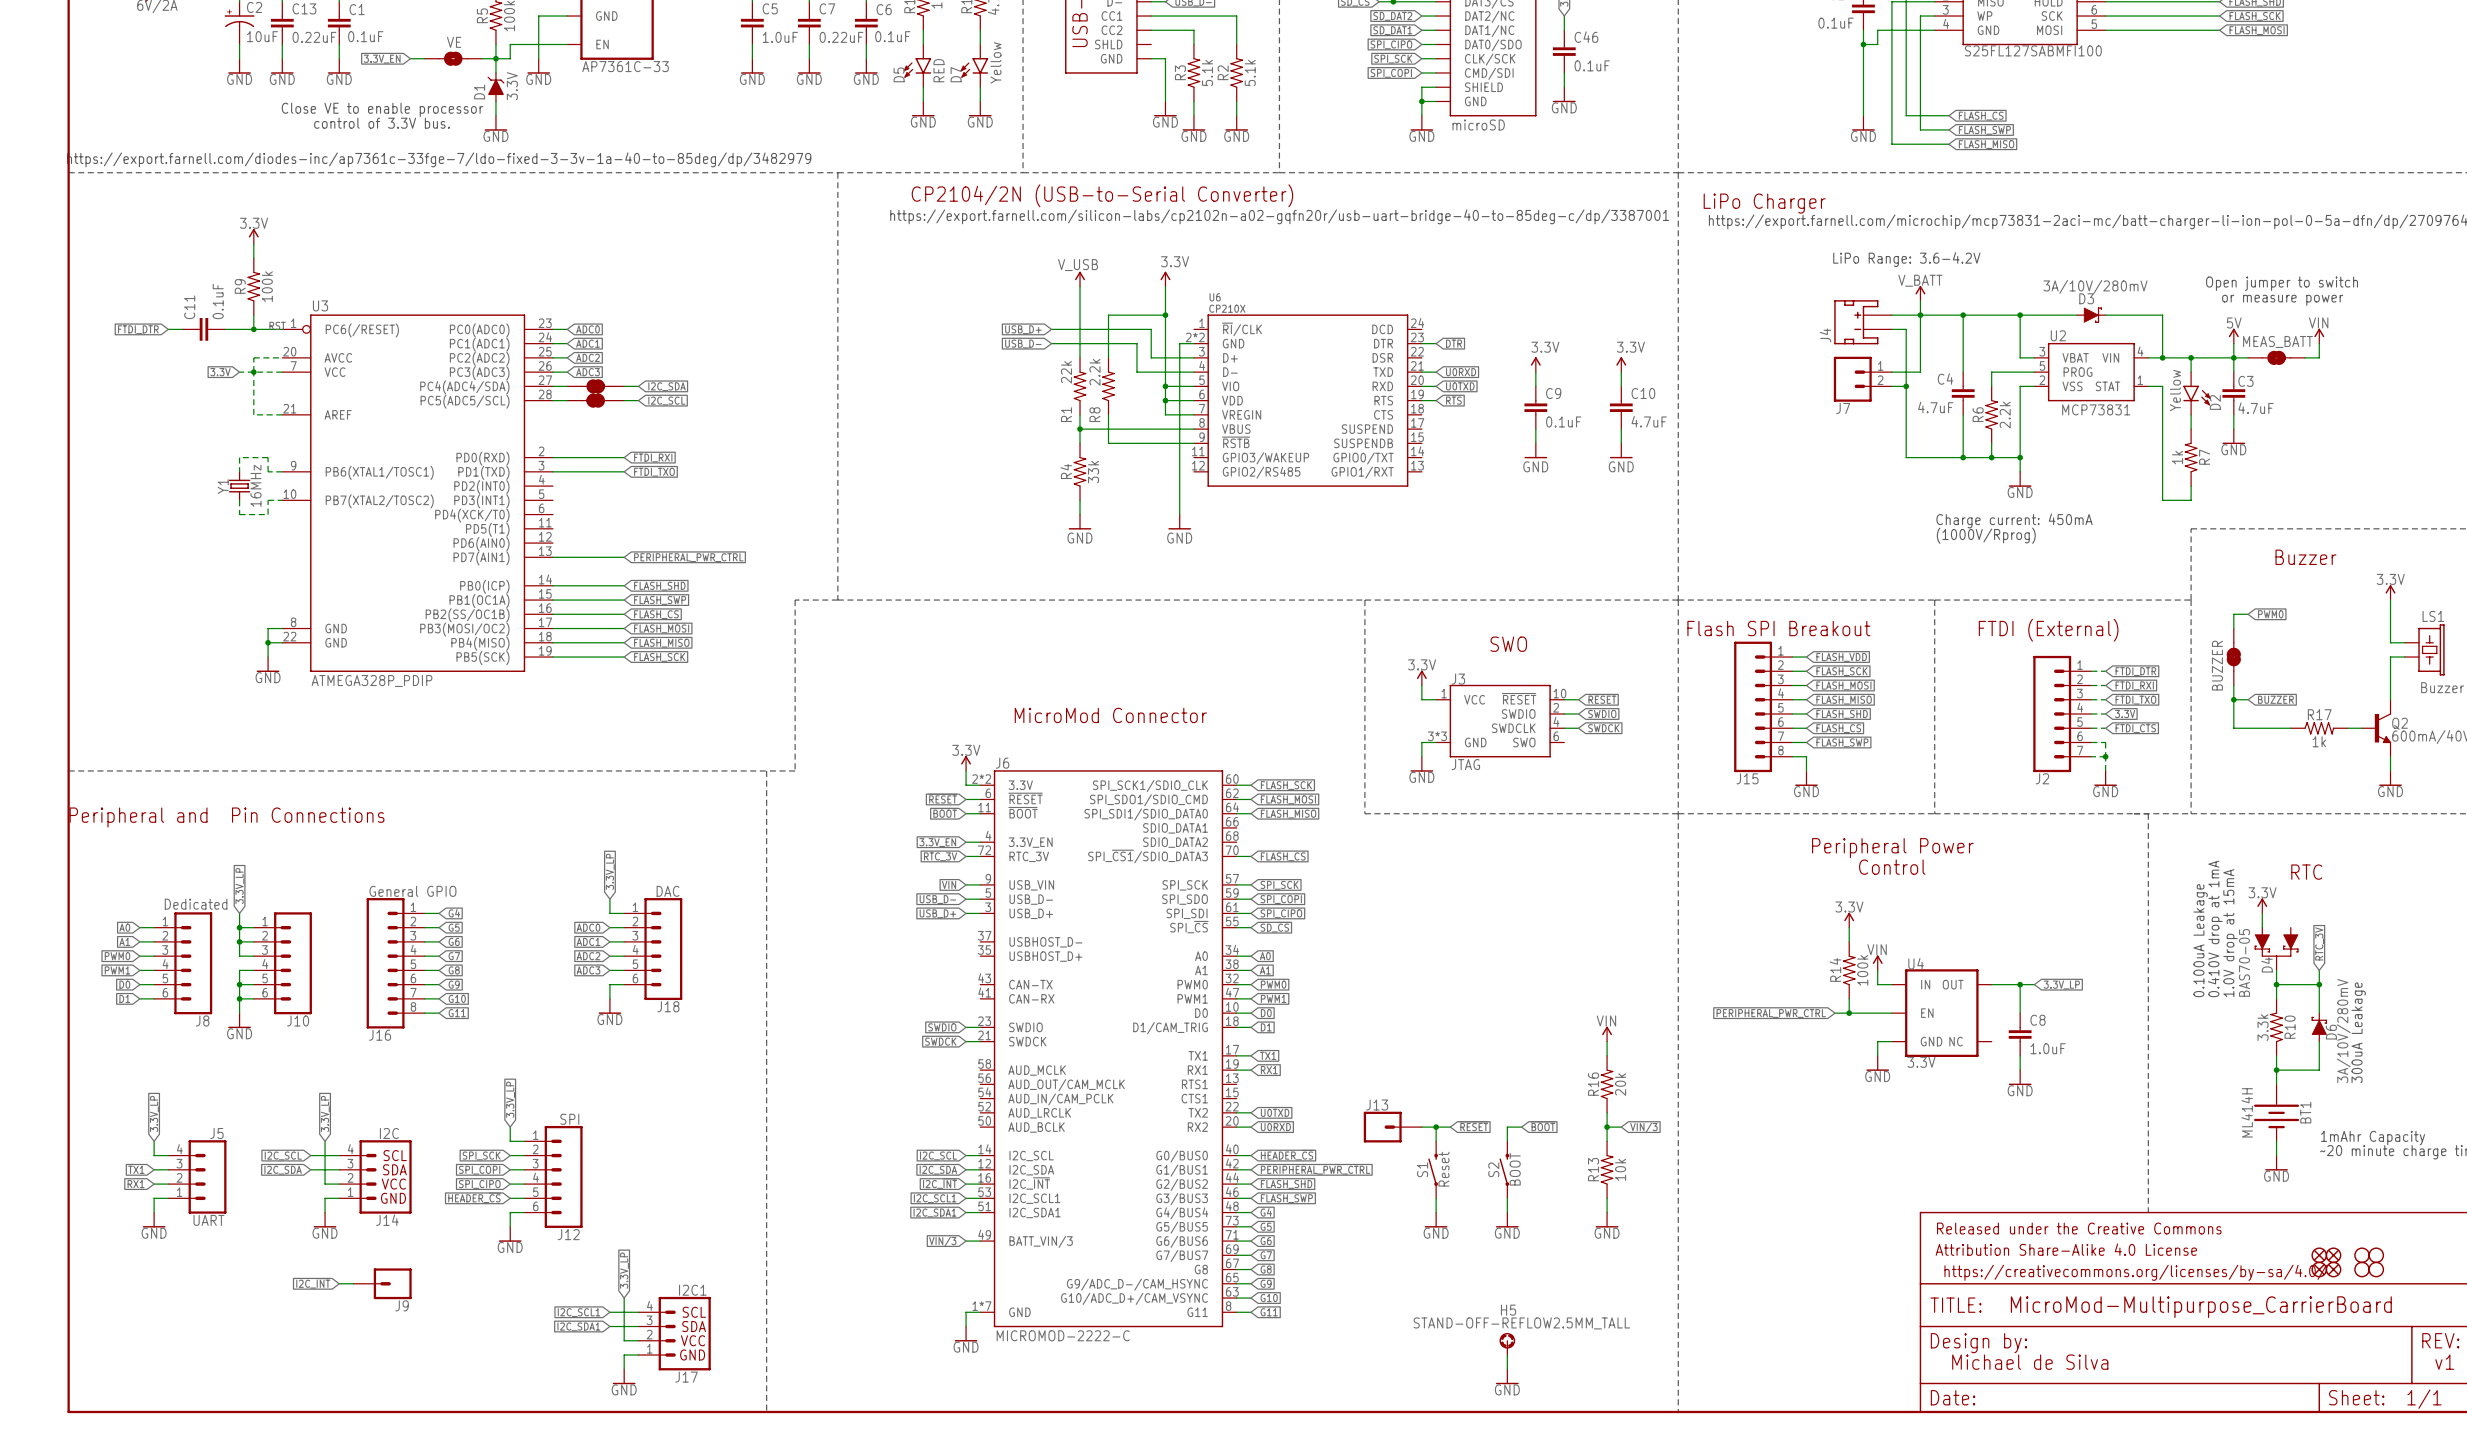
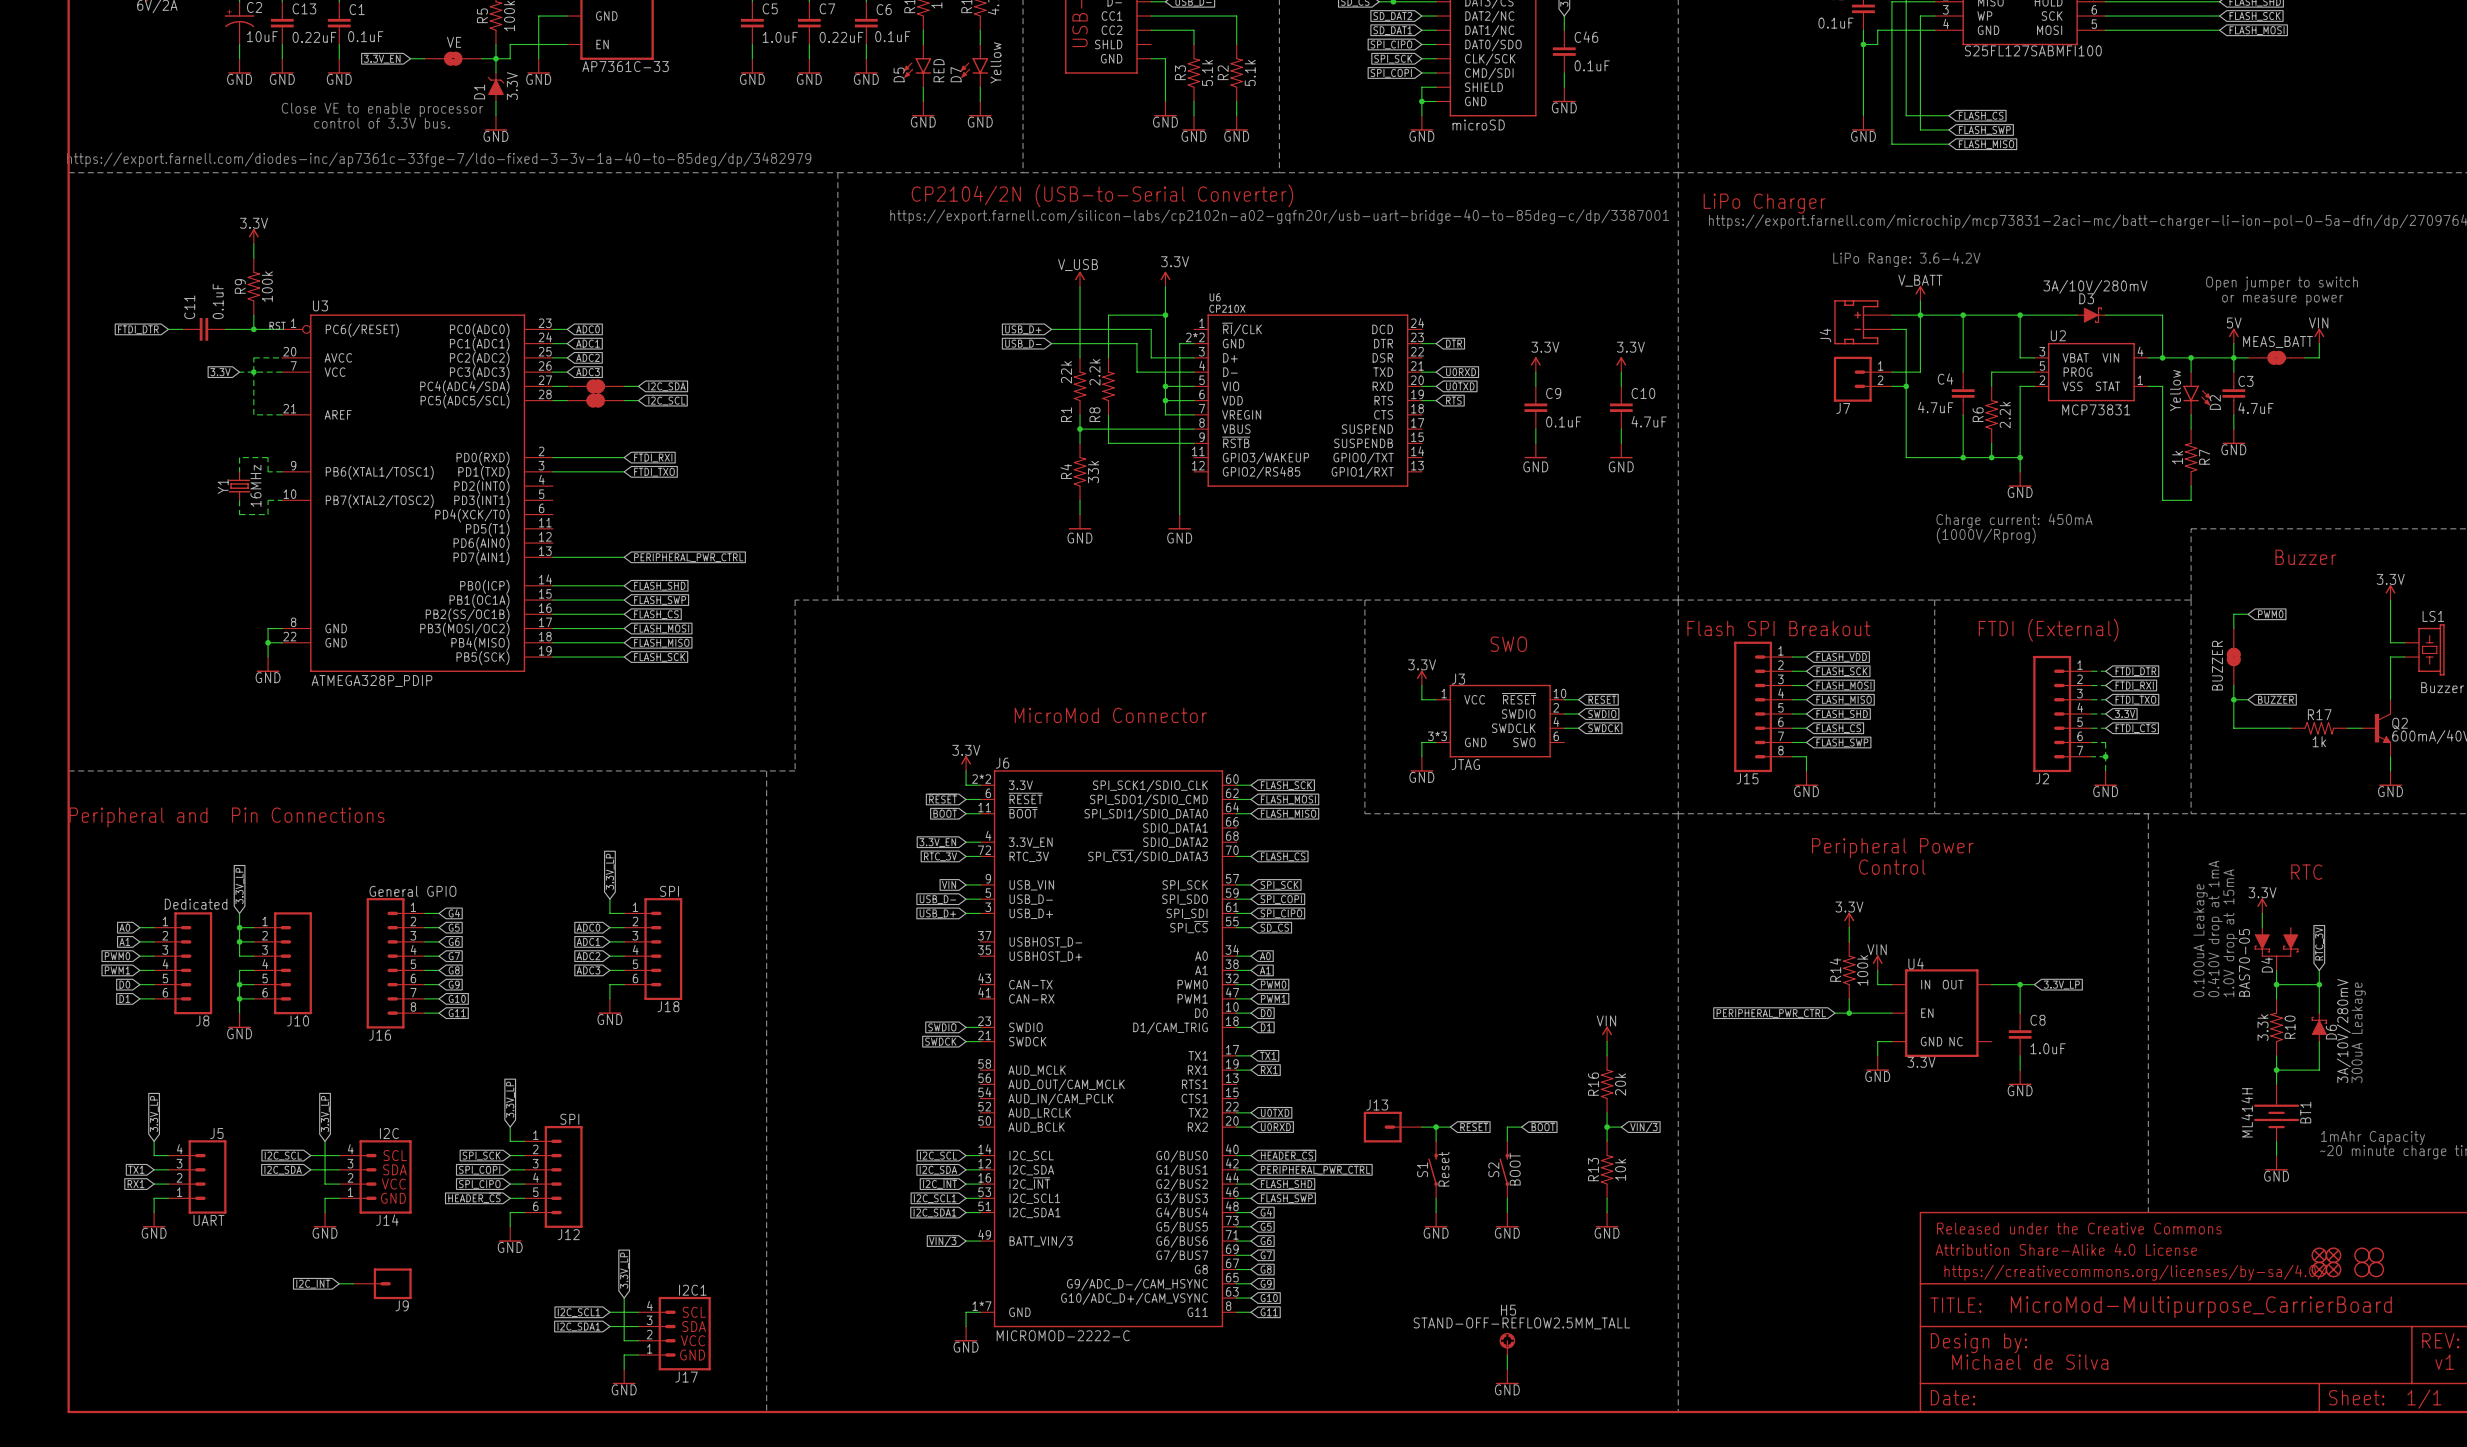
J18 value: DAC (668, 891) -> SPI (669, 891)

